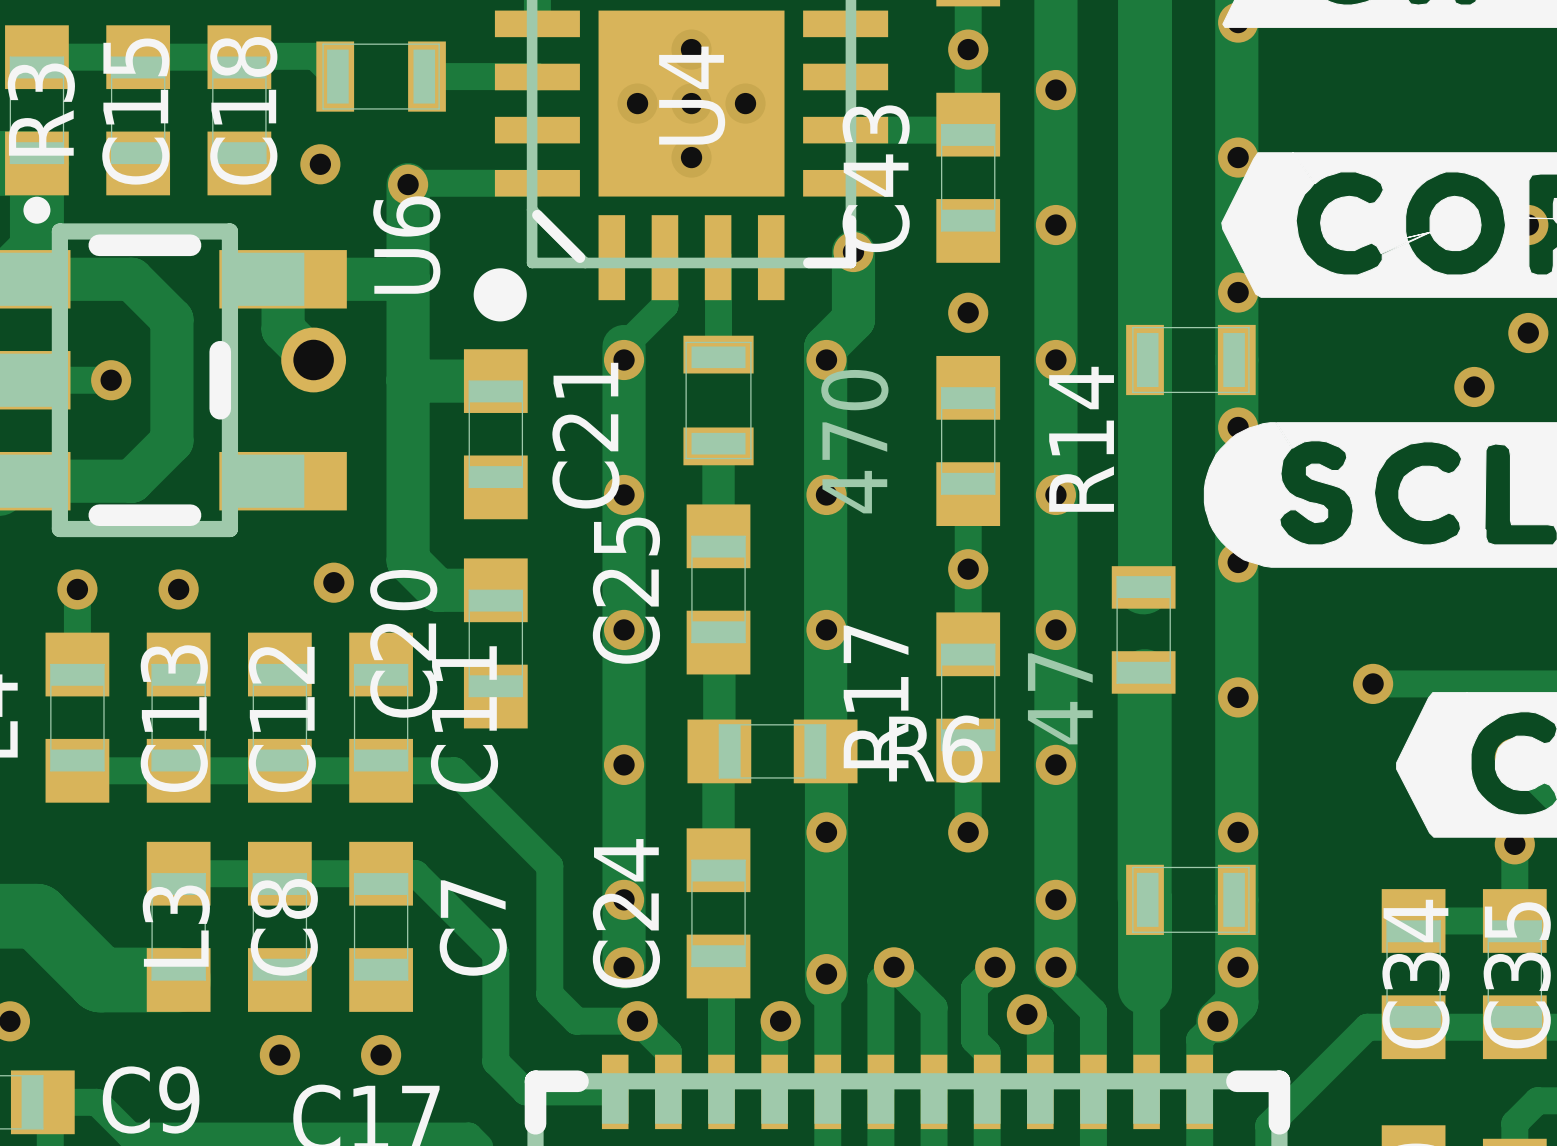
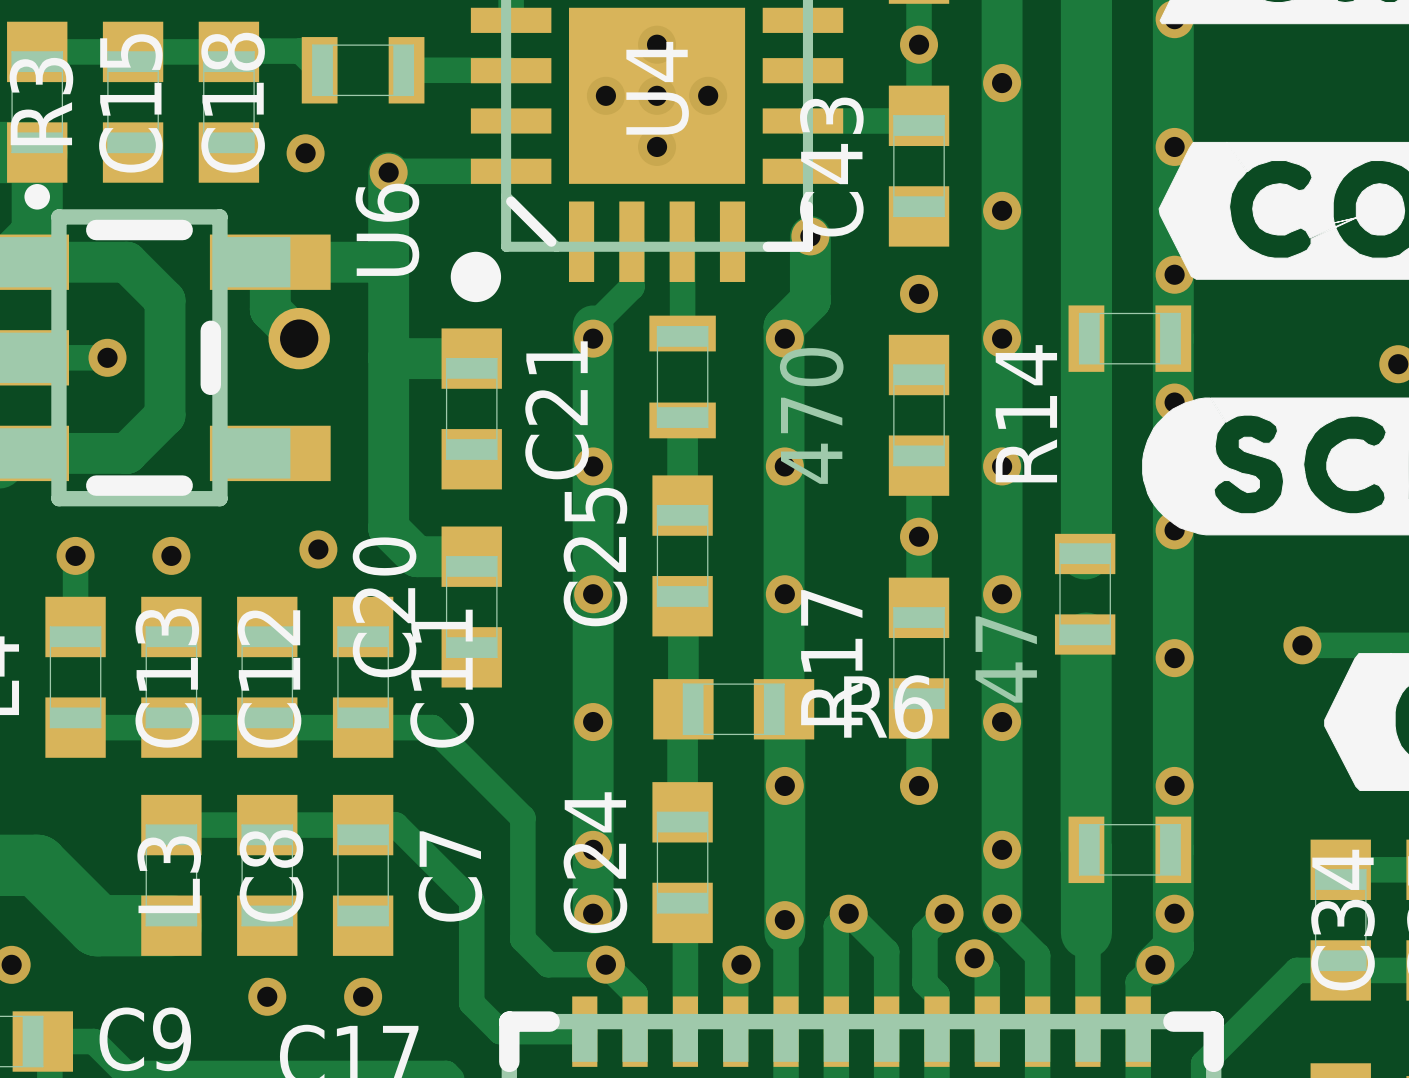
part footprint: [316, 41, 446, 112] -> [301, 37, 425, 104]
part footprint: [1126, 324, 1256, 396] -> [1068, 305, 1192, 372]
part footprint: [683, 335, 754, 466] -> [649, 315, 716, 439]
part footprint: [1126, 864, 1256, 935] -> [1068, 816, 1192, 884]

